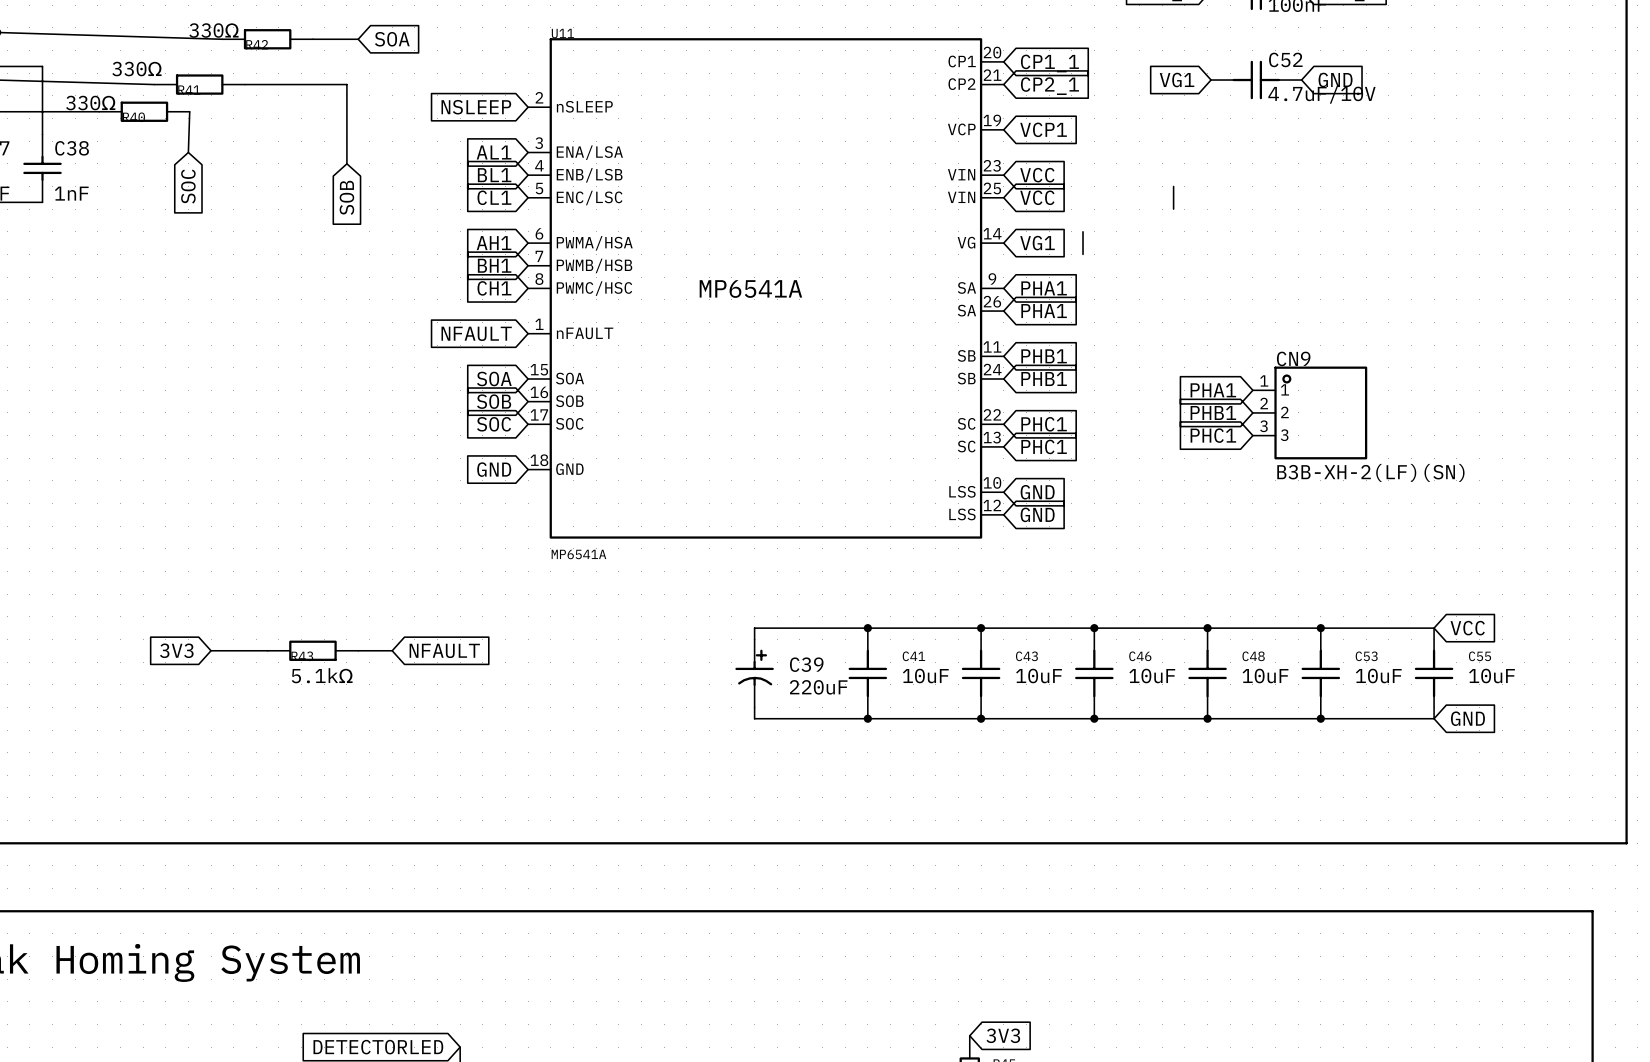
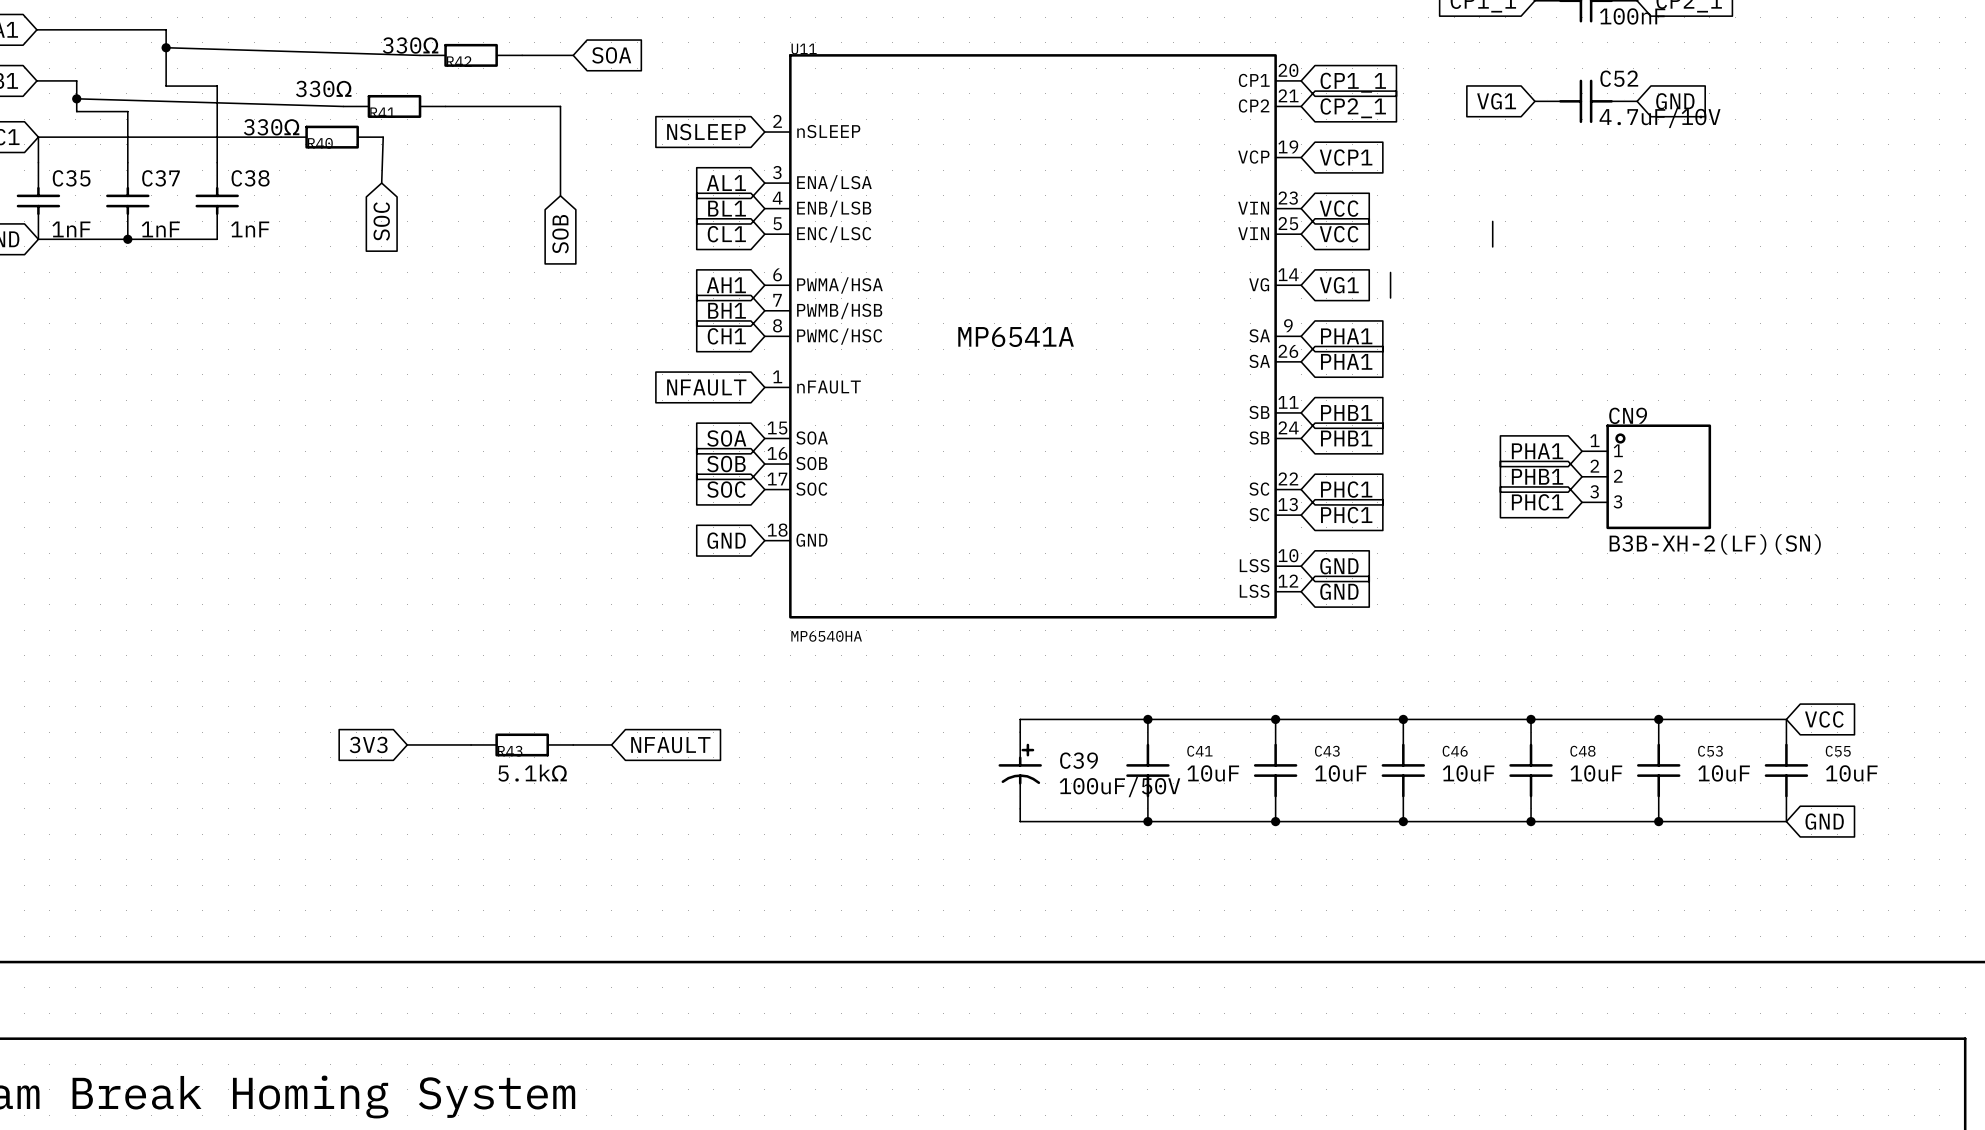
U11 value: MP6541A (578, 554) -> MP6540HA (826, 636)
C39 value: 220uF (818, 687) -> 100uF/50V (1119, 787)

